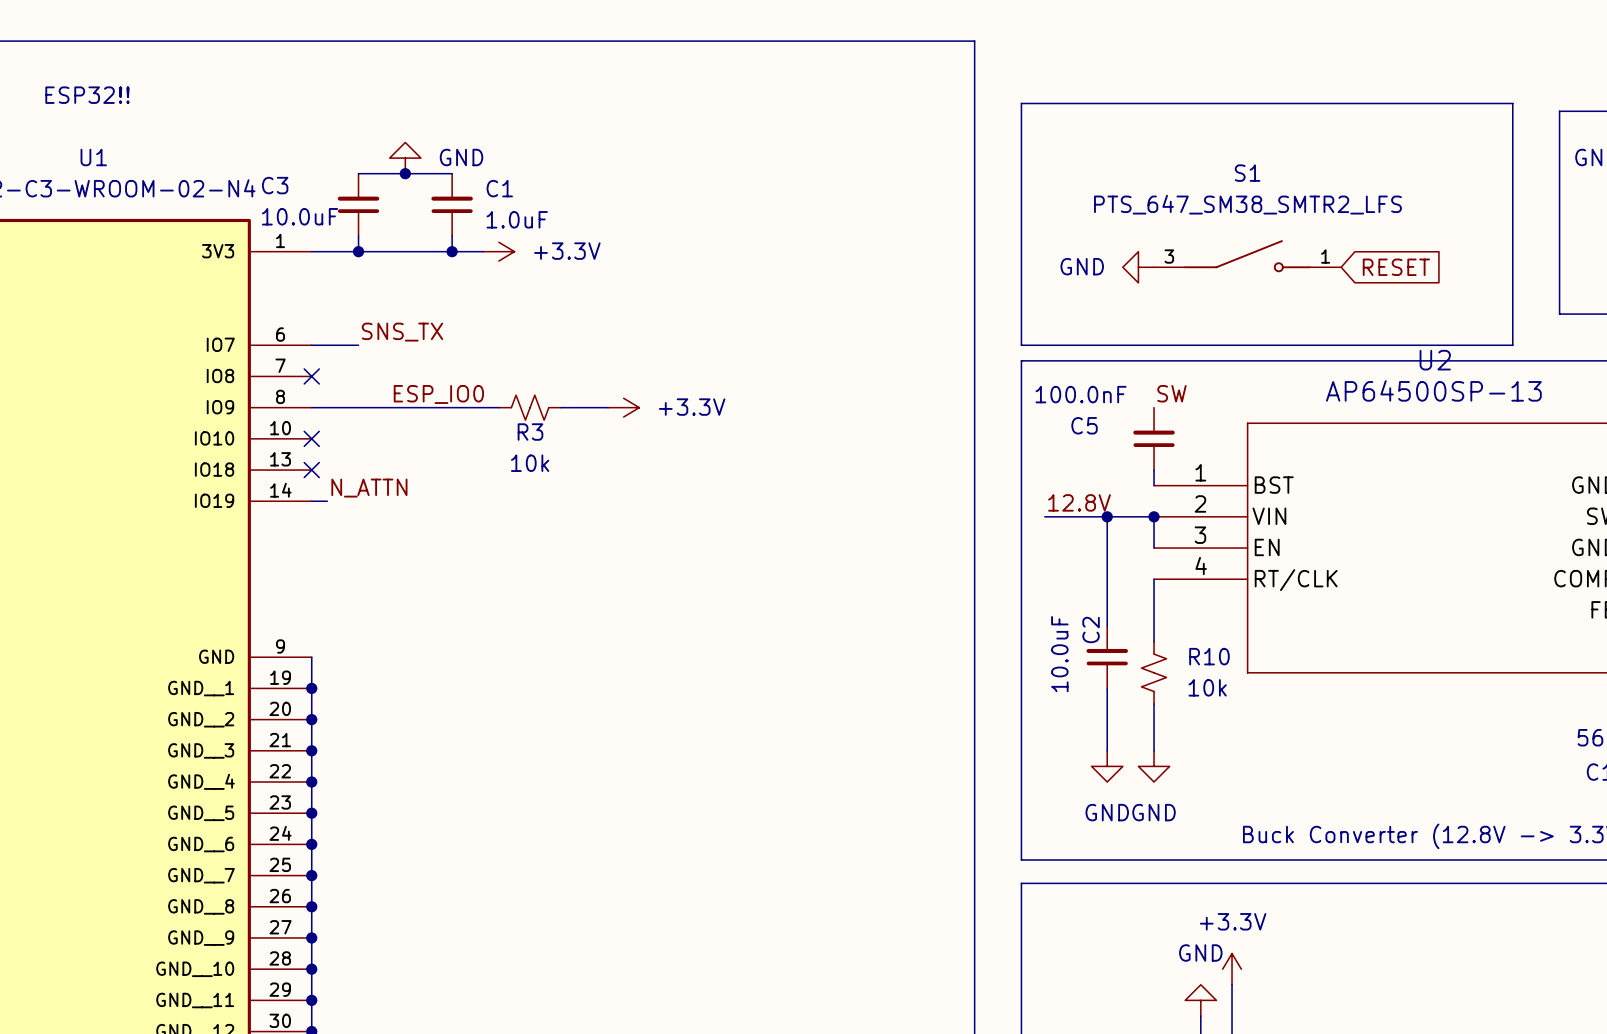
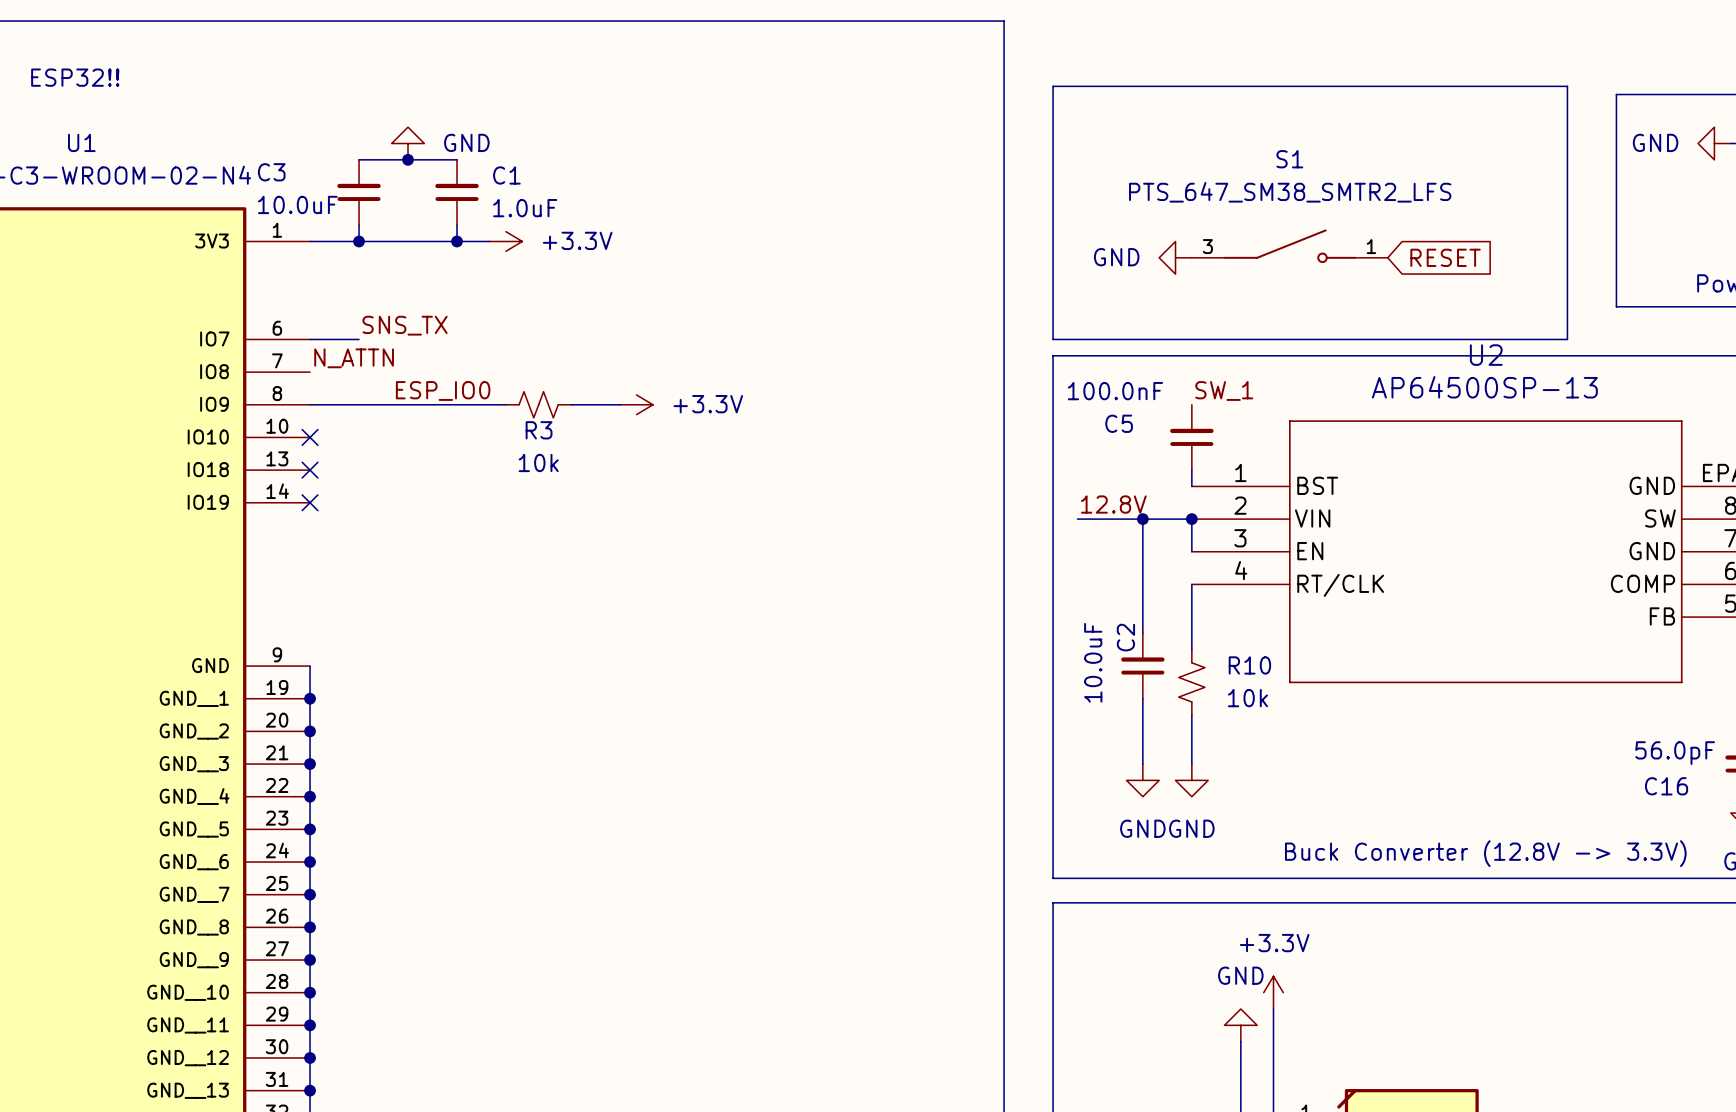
no-connect mark: (311, 376) -> none
label: SW (1171, 393) -> SW_1 (1224, 390)
label position: N_ATTN (369, 488) -> N_ATTN (354, 358)
wire: (311, 501) (327, 501) -> none
no-connect mark: none -> (310, 502)

